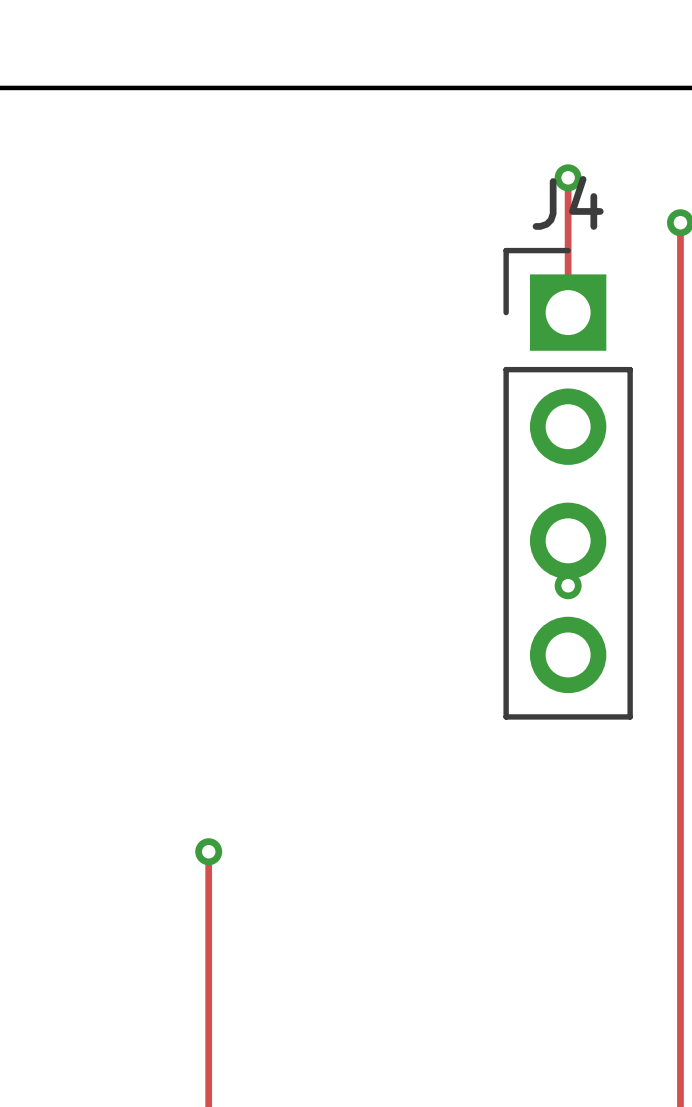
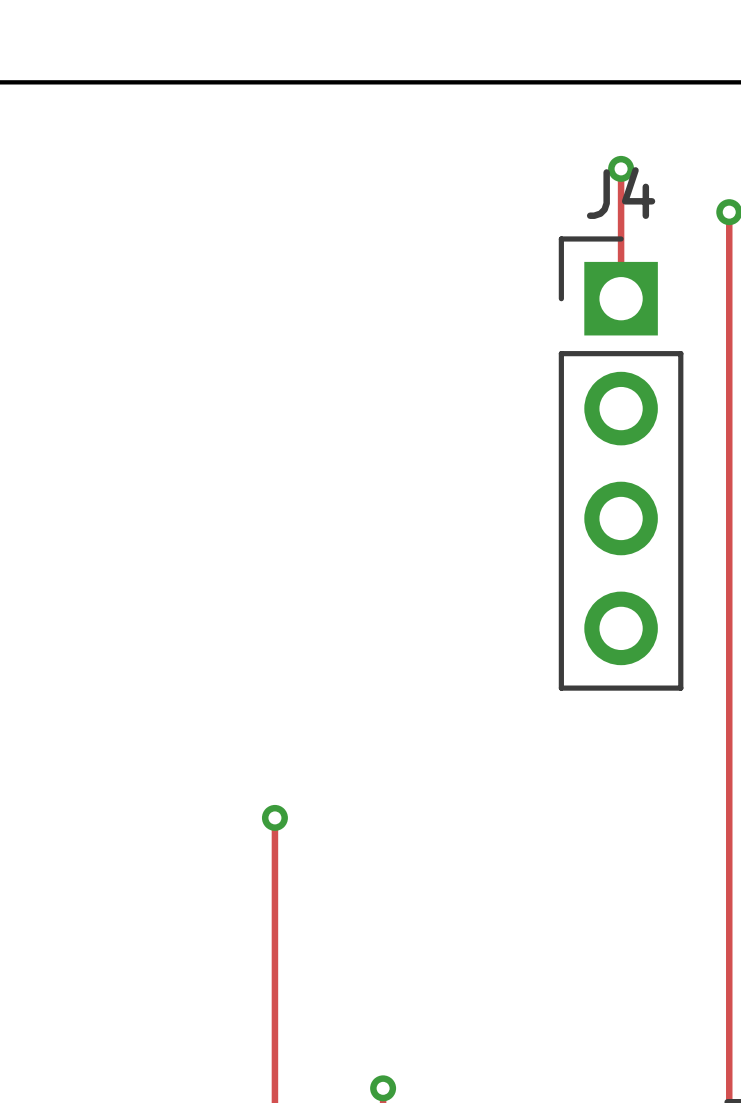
via: (568, 585) -> none

